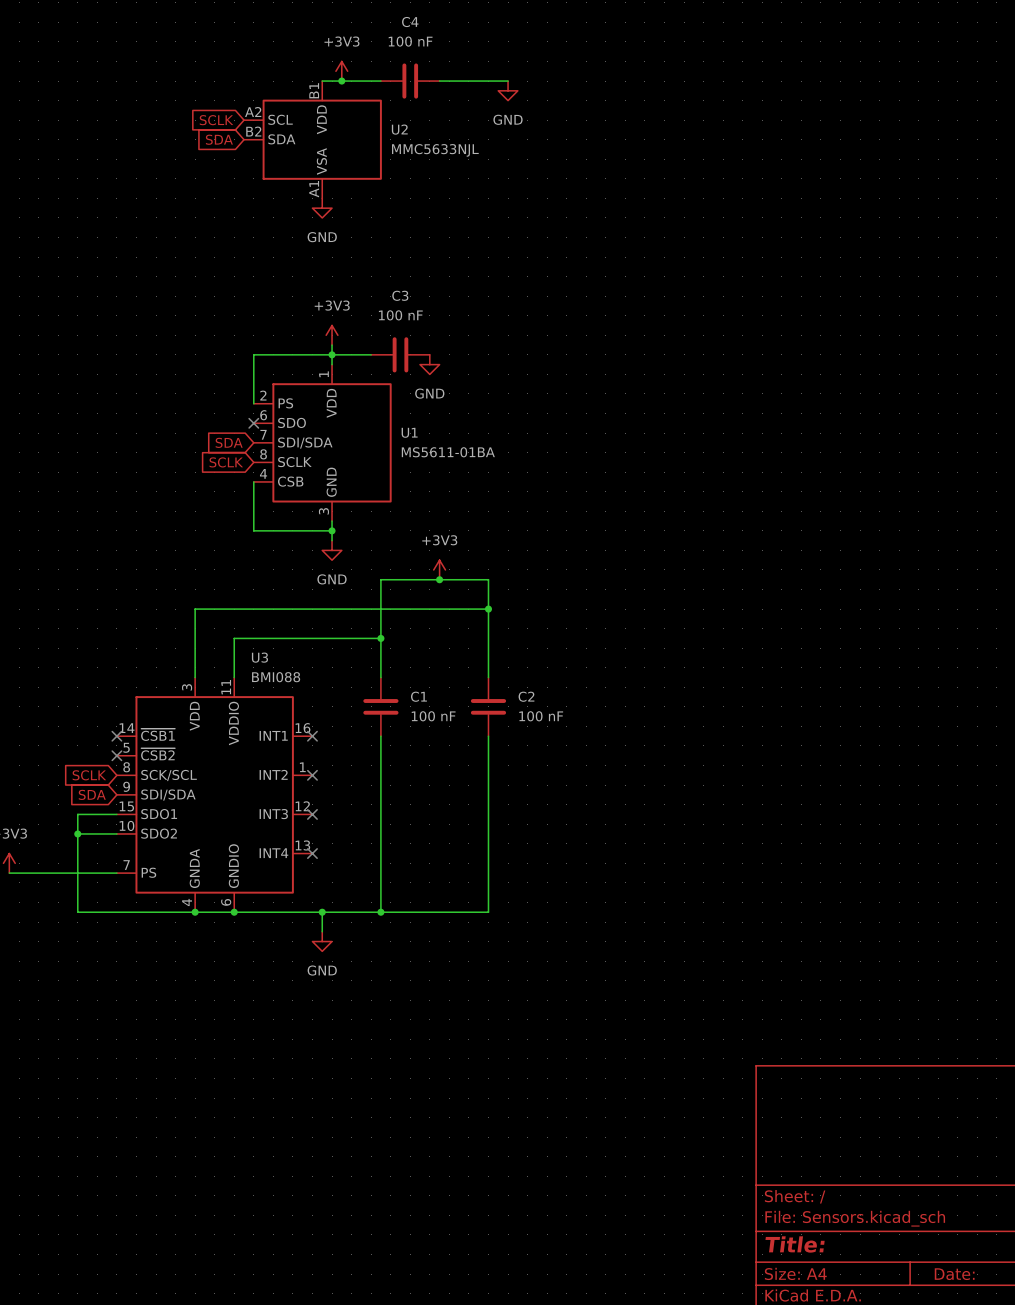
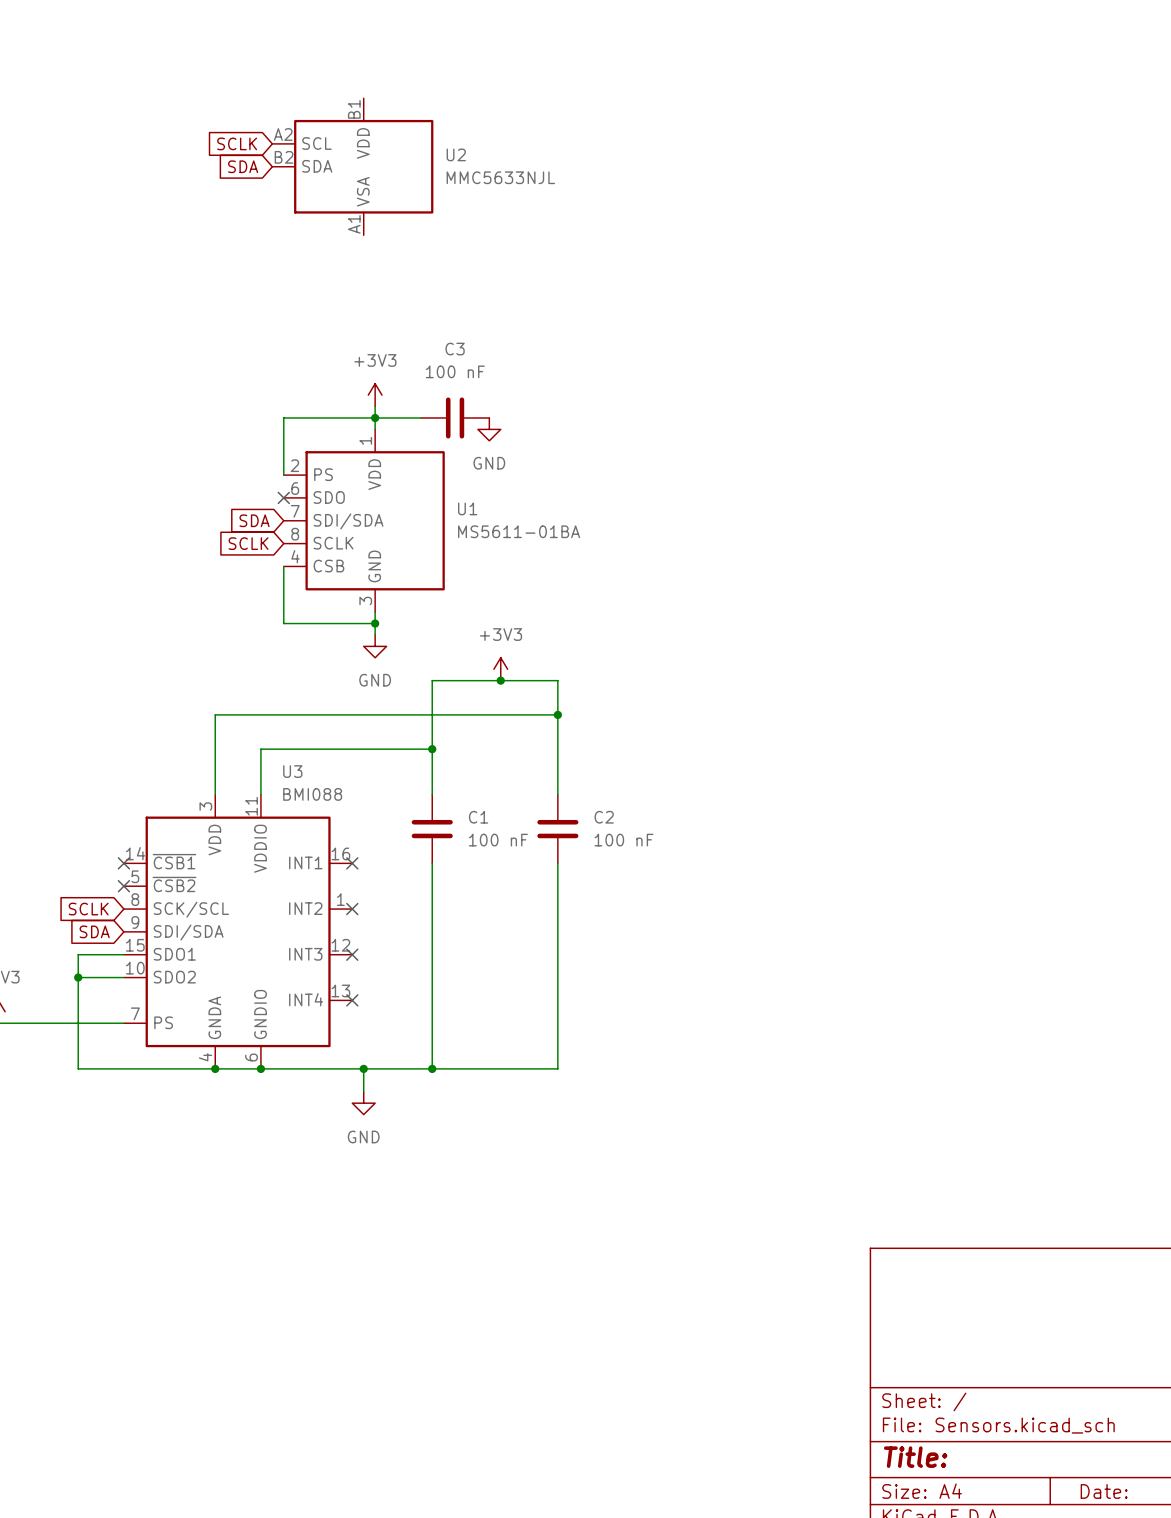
power symbol: +3V3 (341, 71) -> none
wire: (322, 81) (380, 81) -> none
junction: (341, 81) -> none
C4: 100 nF (410, 81) -> none
wire: (439, 81) (508, 81) -> none
power symbol: GND (508, 90) -> none
power symbol: GND (322, 208) -> none

